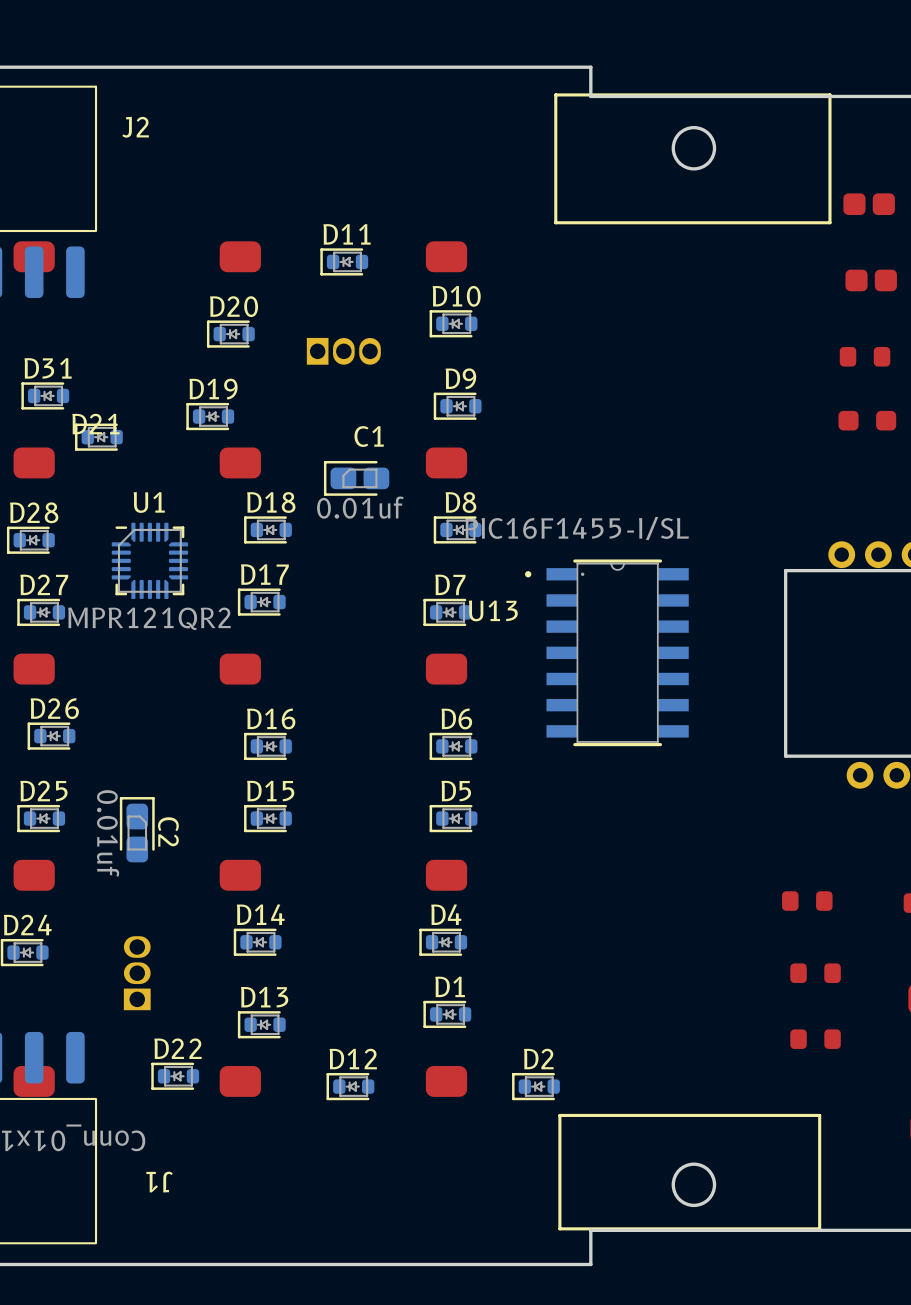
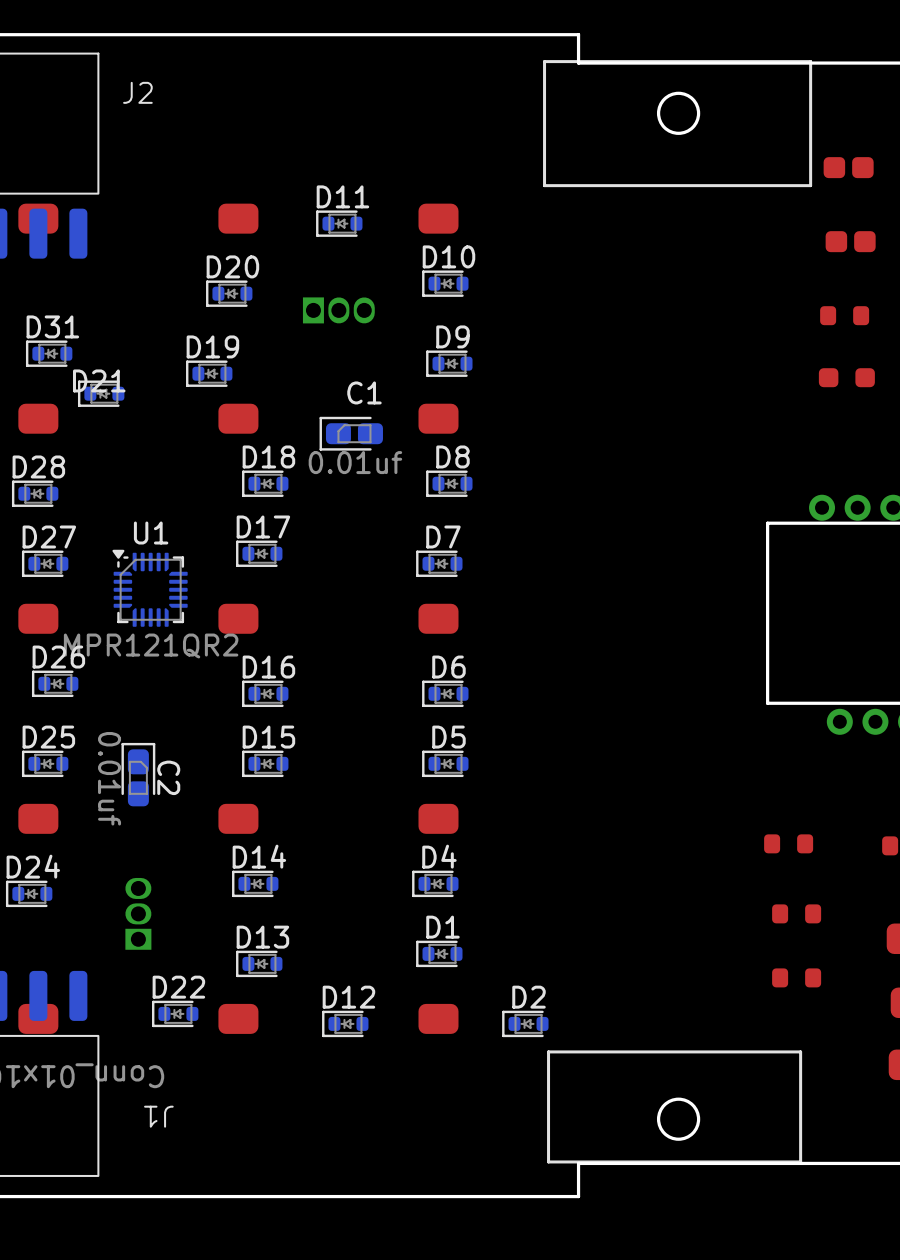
U1 footprint: [111, 522, 189, 600] -> [112, 549, 188, 627]
U13: PIC16F1455-I/SL (606, 652) -> none

